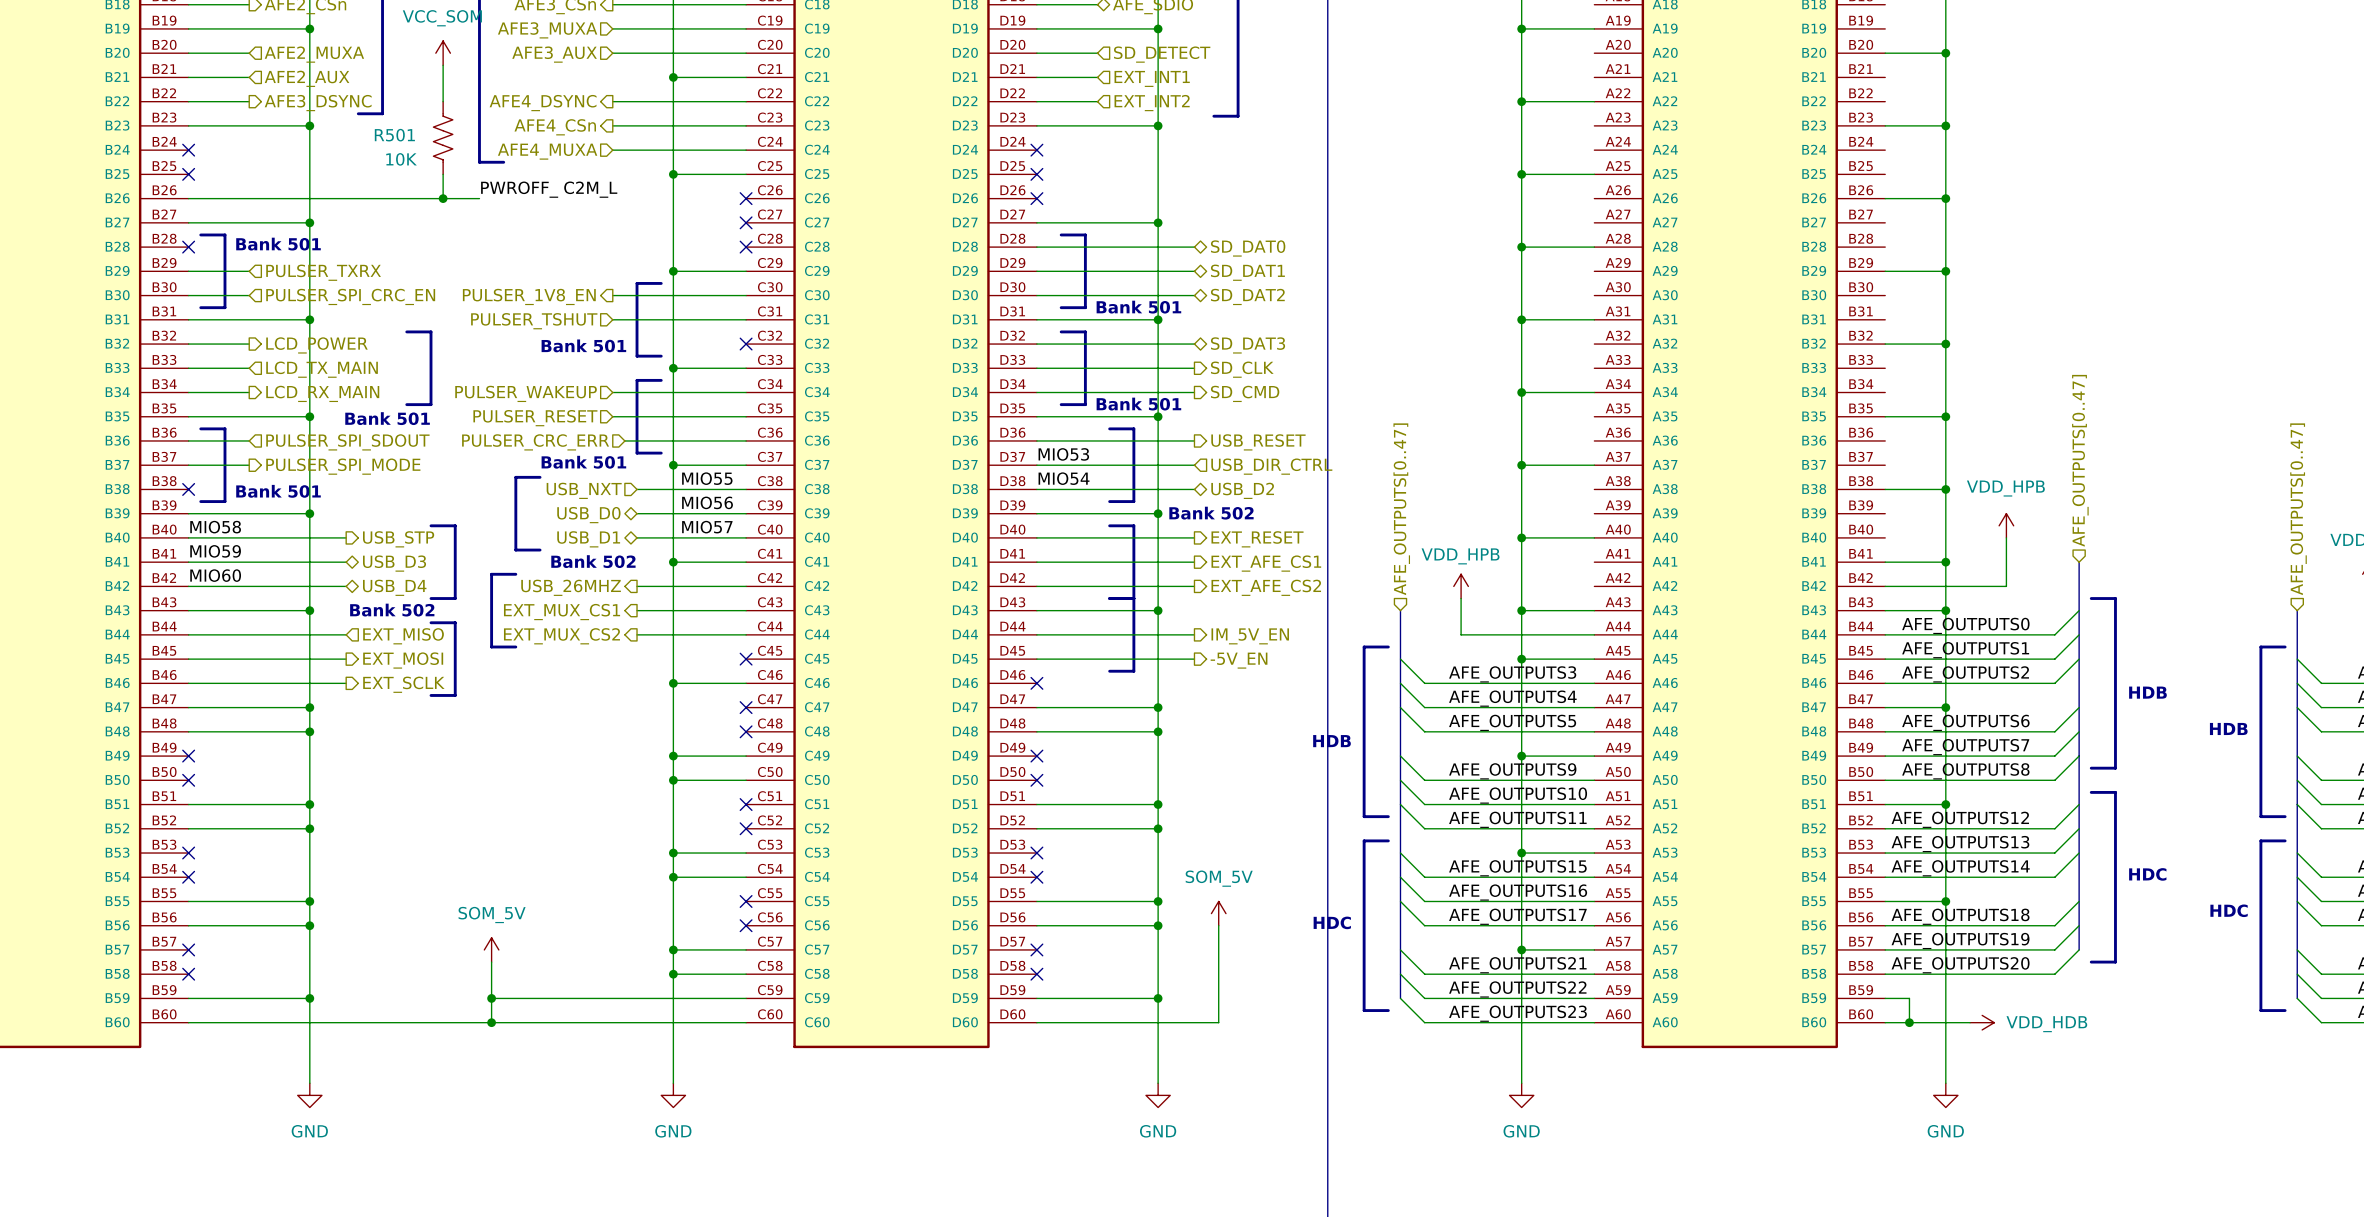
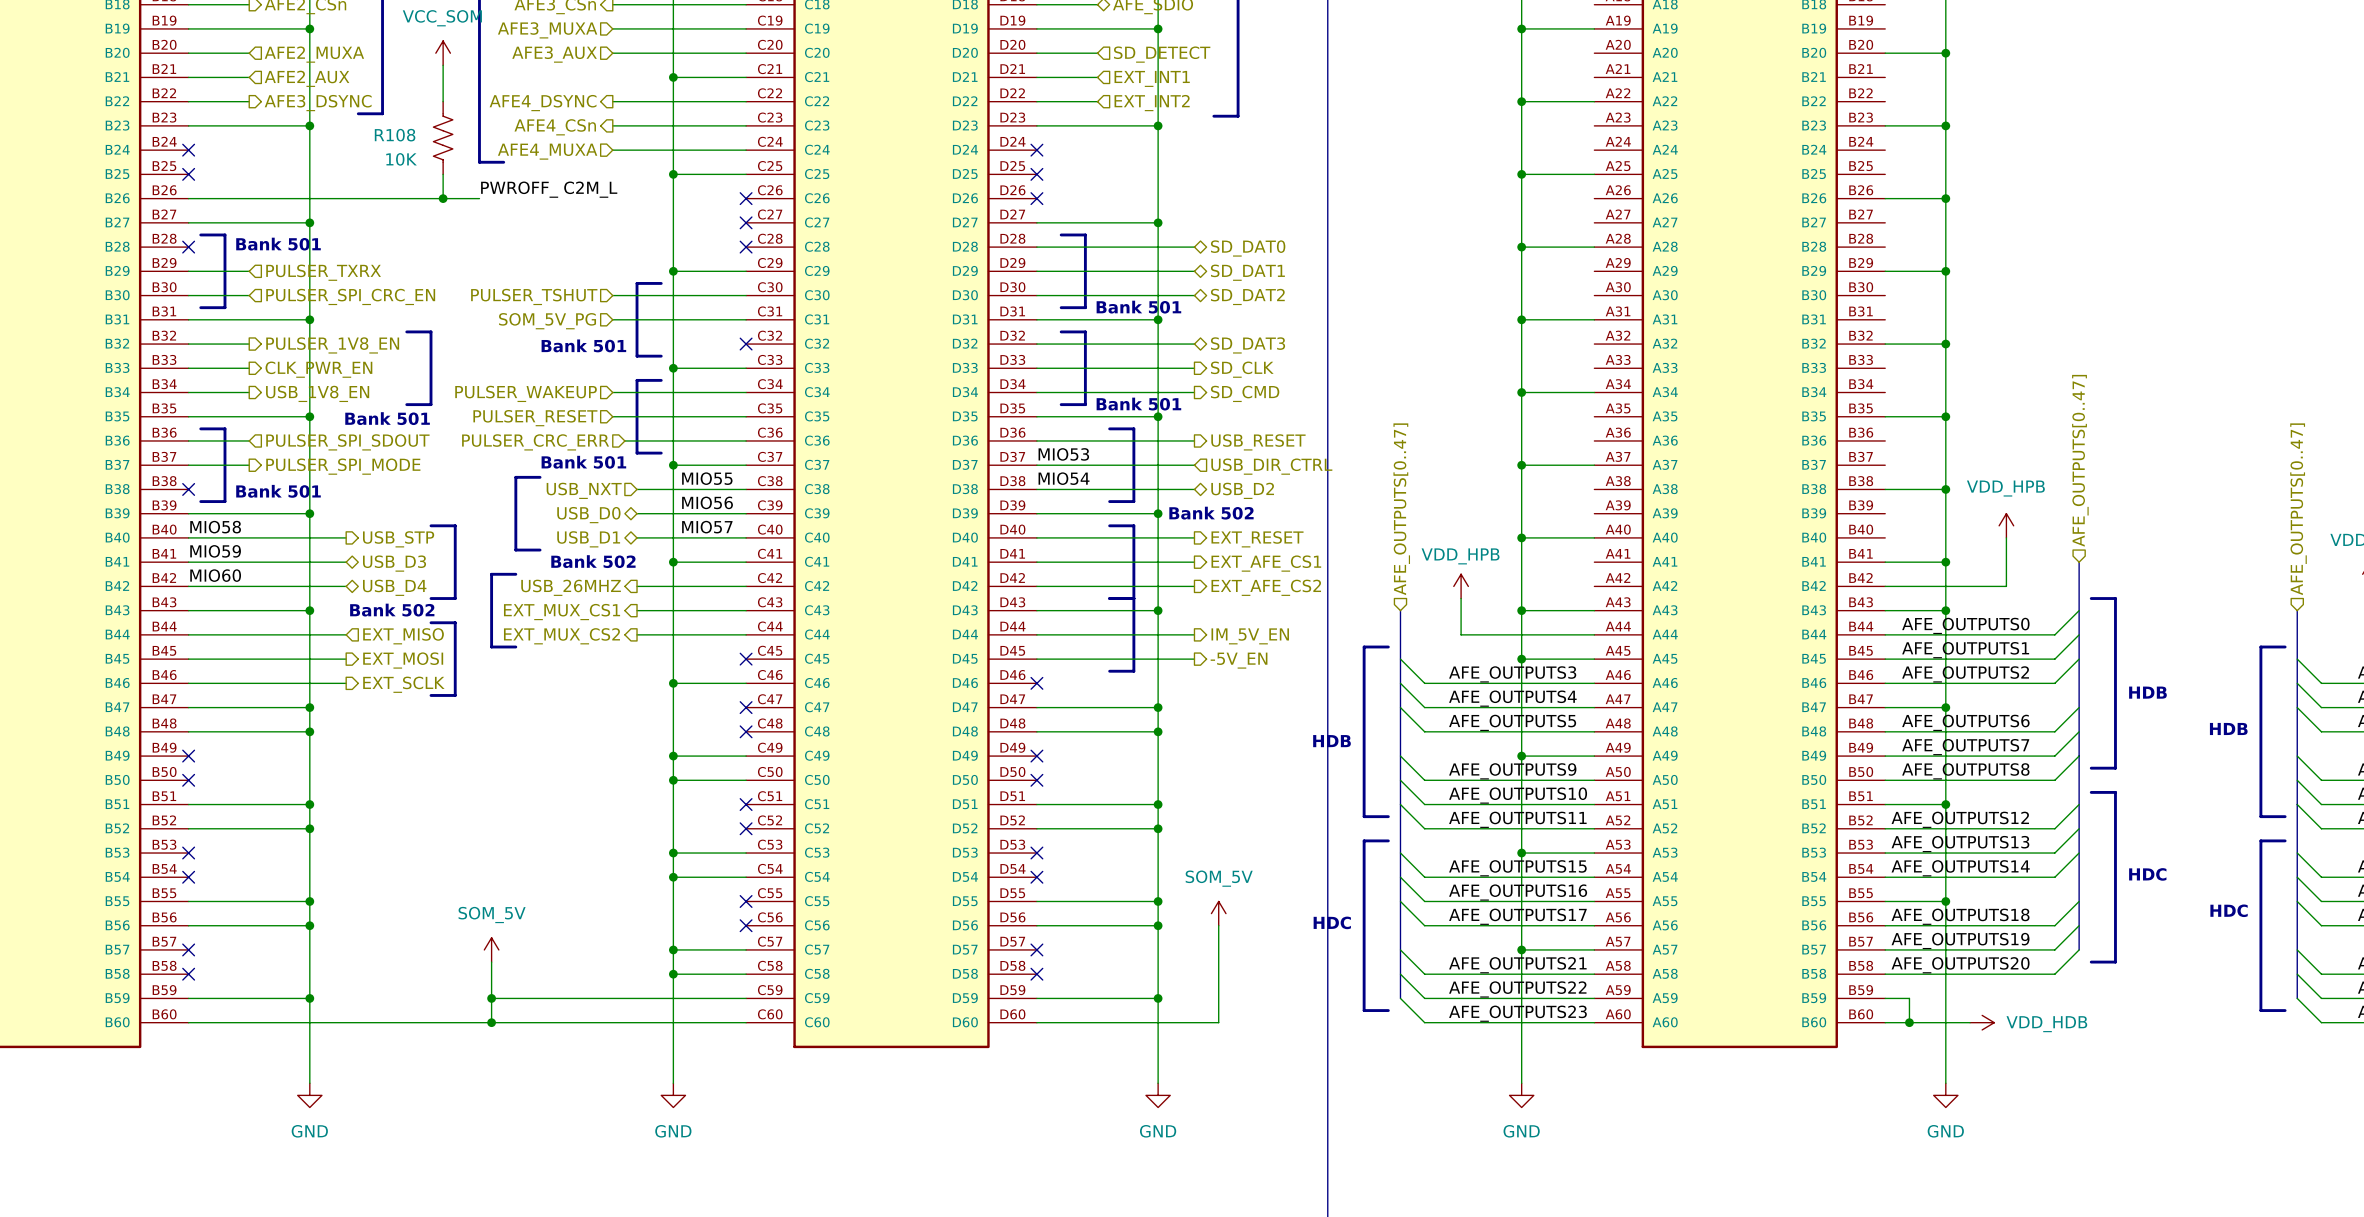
R501 name: R501 (394, 135) -> R108 (395, 135)
hierarchical label shape: output (529, 296) -> input (534, 296)
hierarchical label: PULSER_1V8_EN (529, 296) -> PULSER_TSHUT (534, 296)
hierarchical label: PULSER_TSHUT (534, 321) -> SOM_5V_PG (547, 321)
hierarchical label: LCD_POWER (316, 345) -> PULSER_1V8_EN (332, 345)
hierarchical label shape: input (322, 369) -> output (318, 369)
hierarchical label: LCD_TX_MAIN (322, 369) -> CLK_PWR_EN (318, 369)
hierarchical label: LCD_RX_MAIN (322, 393) -> USB_1V8_EN (317, 393)

